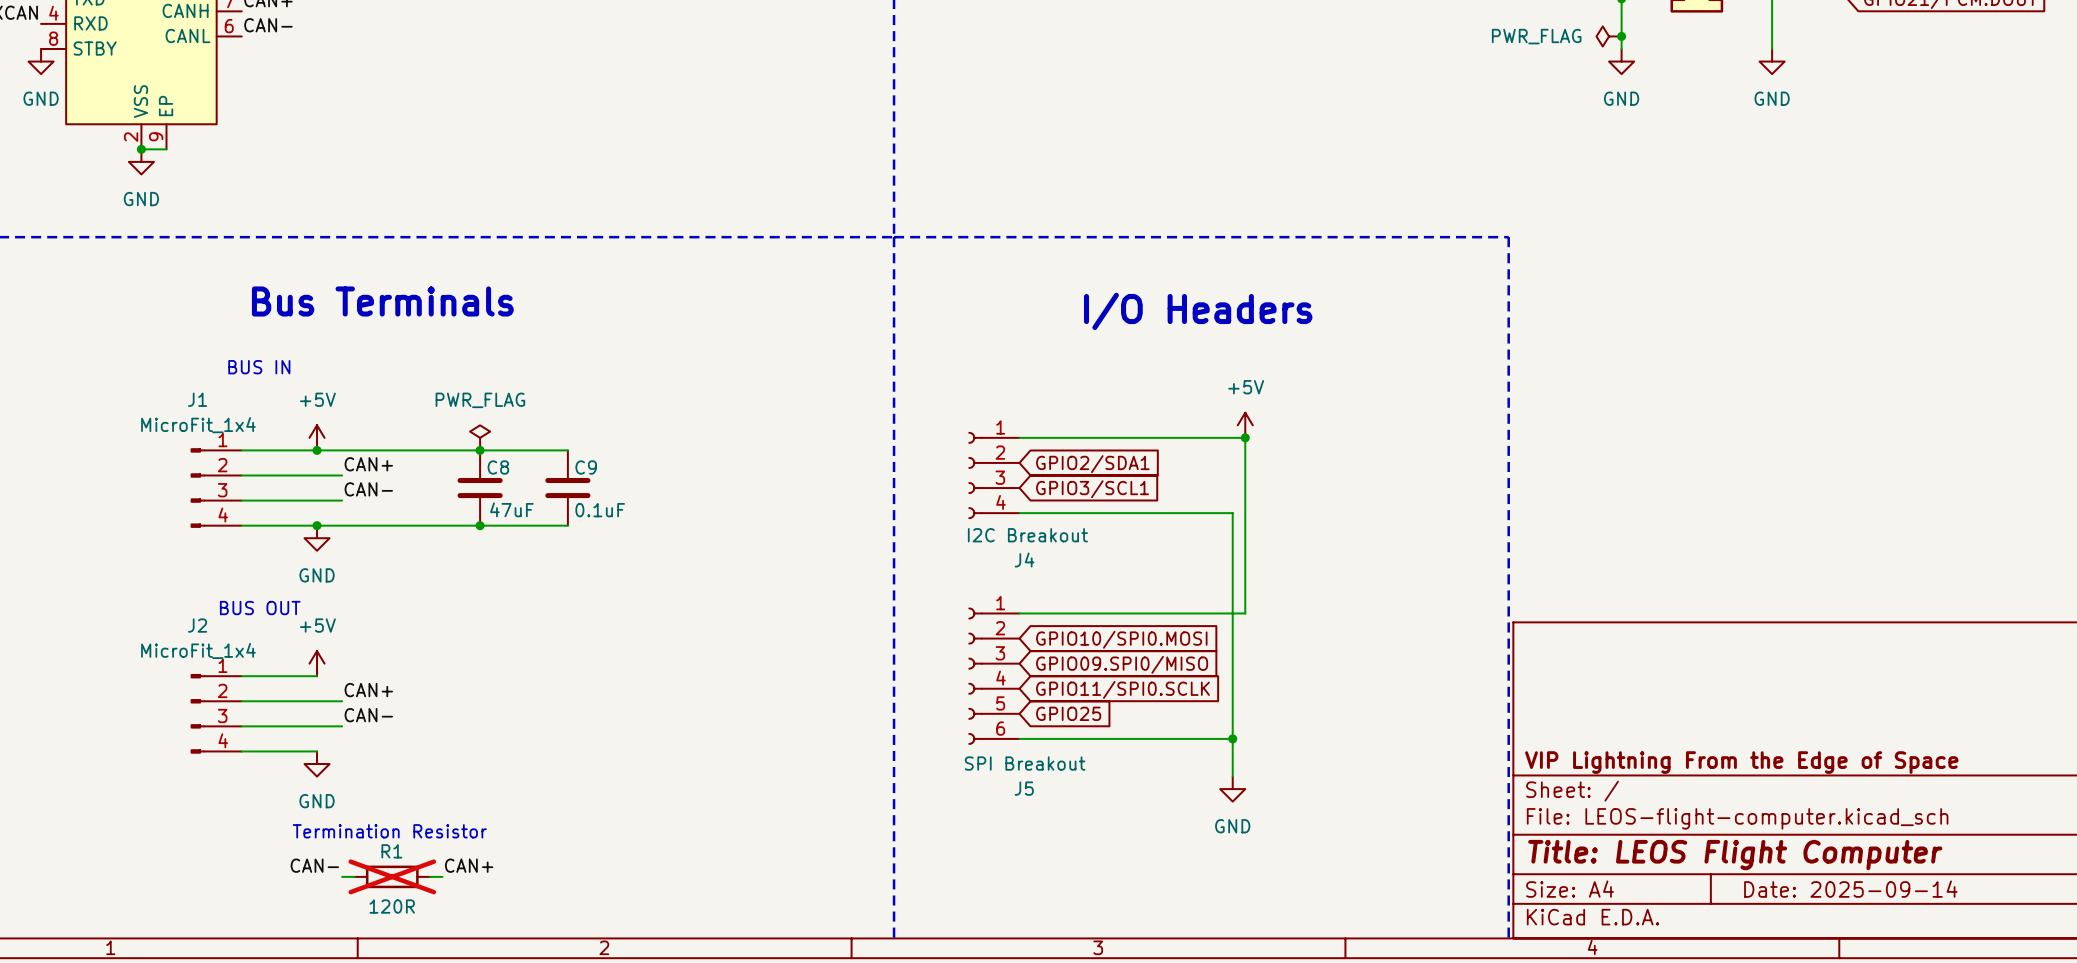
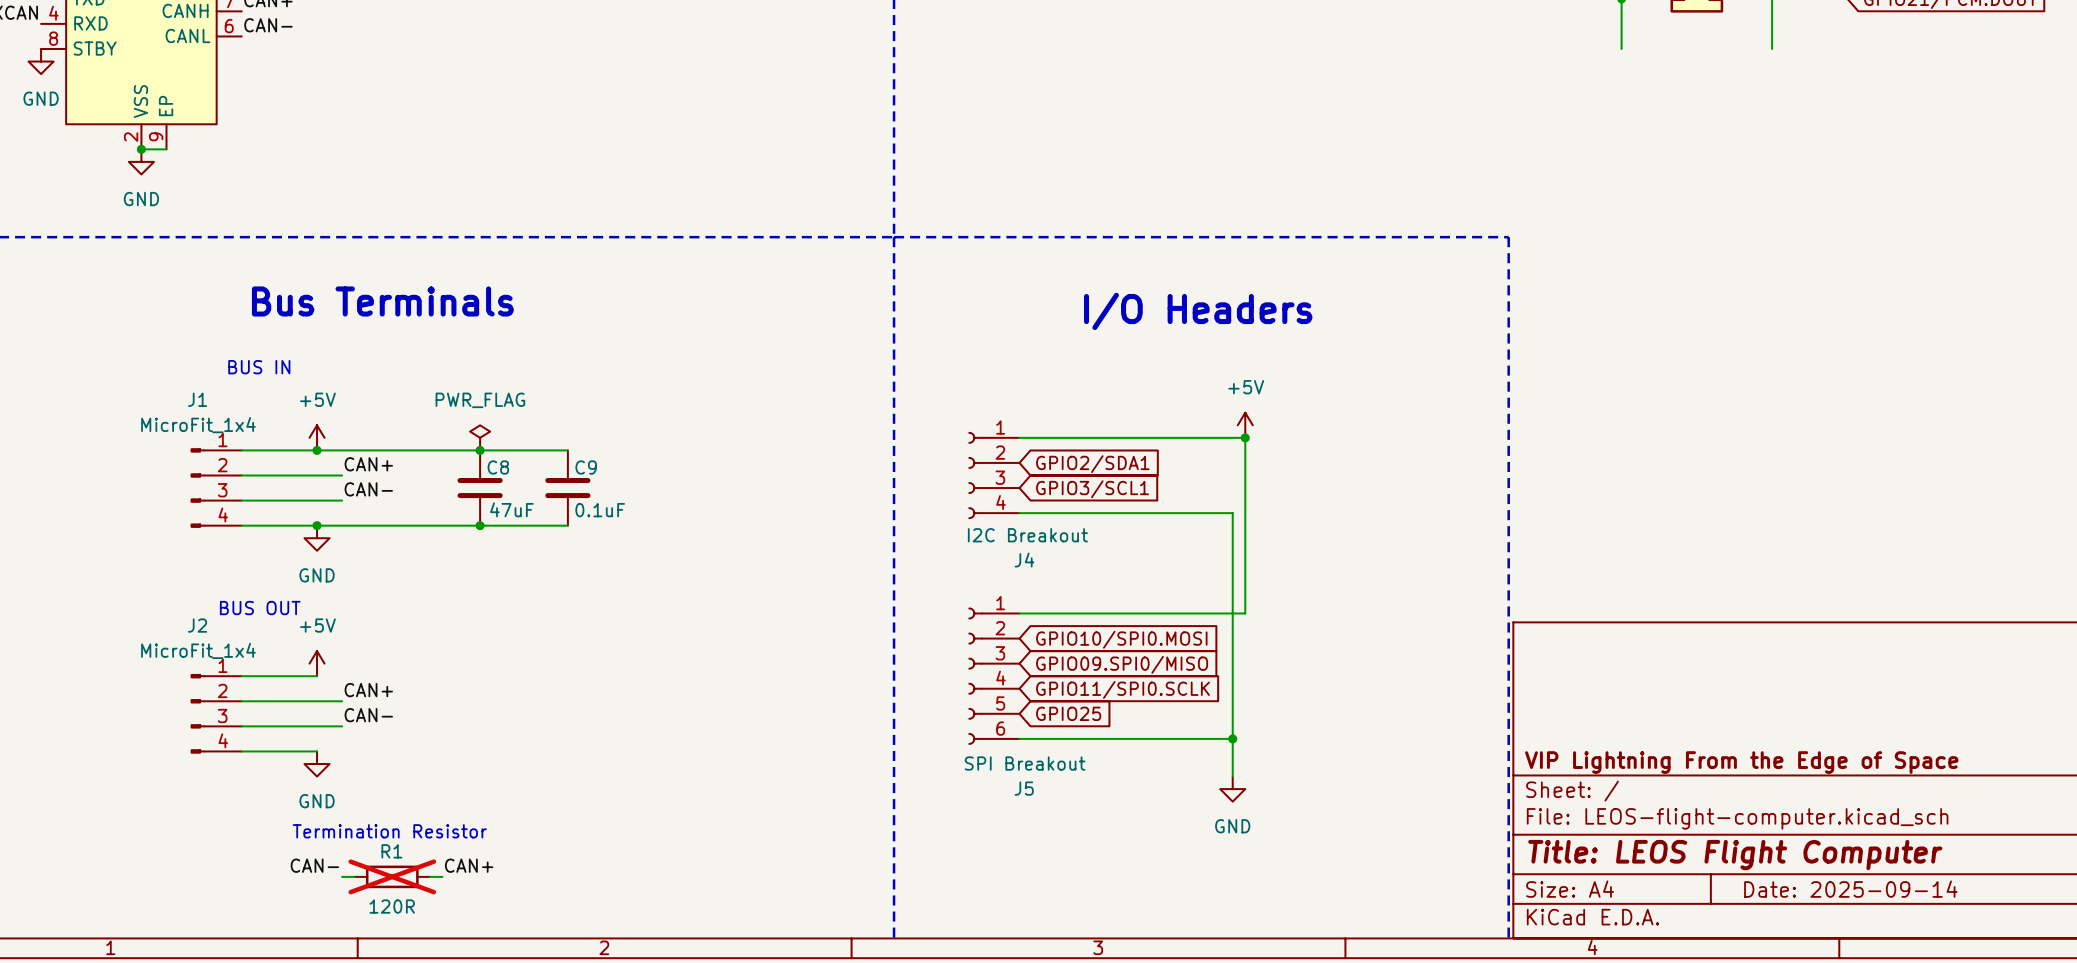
power symbol: PWR_FLAG (1609, 36) -> none
junction: (1621, 36) -> none
power symbol: GND (1621, 61) -> none
power symbol: GND (1772, 61) -> none

